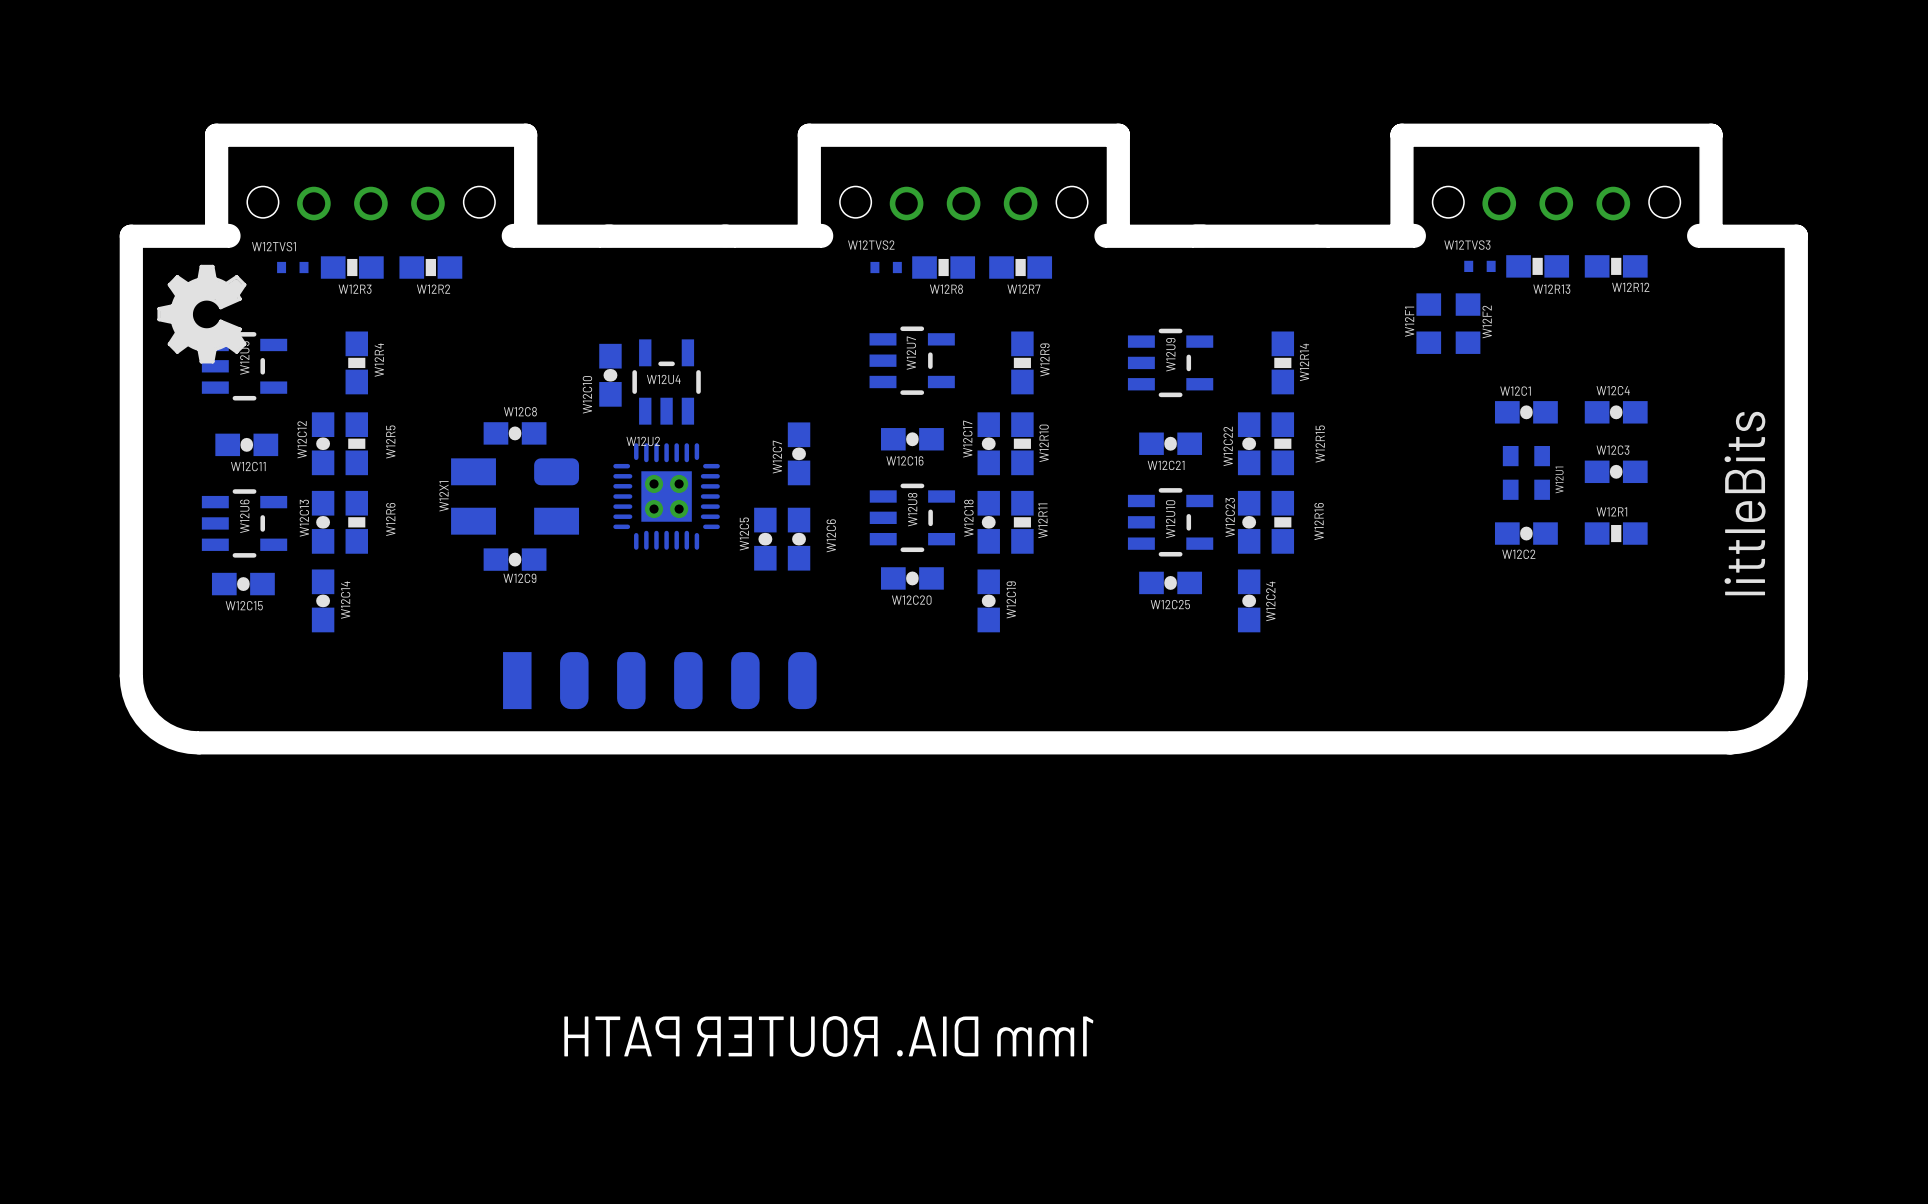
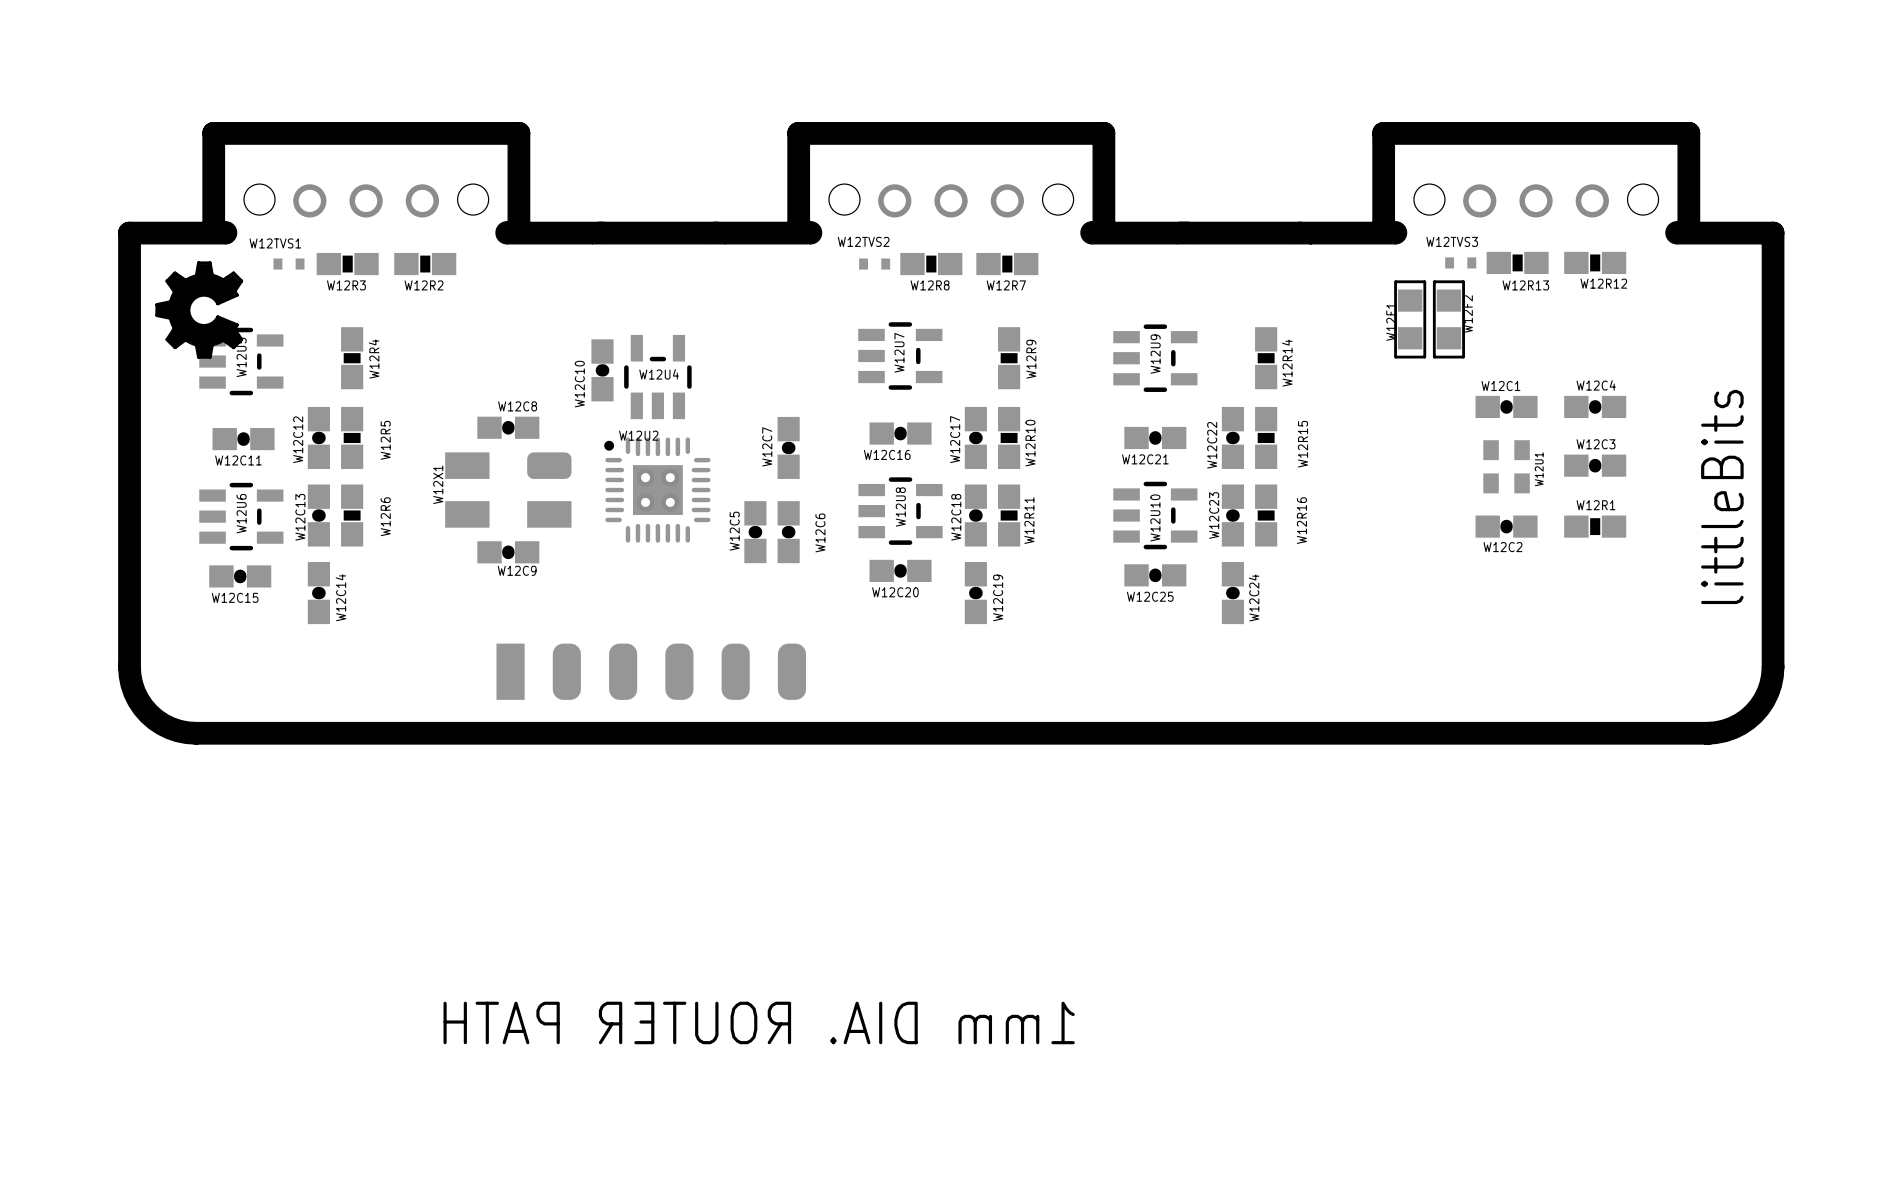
W12F1 footprint: [1416, 293, 1442, 354] -> [1394, 280, 1427, 359]
W12F2 footprint: [1455, 293, 1481, 354] -> [1432, 280, 1465, 359]
W12U2 footprint: [613, 443, 720, 550] -> [604, 437, 711, 543]

